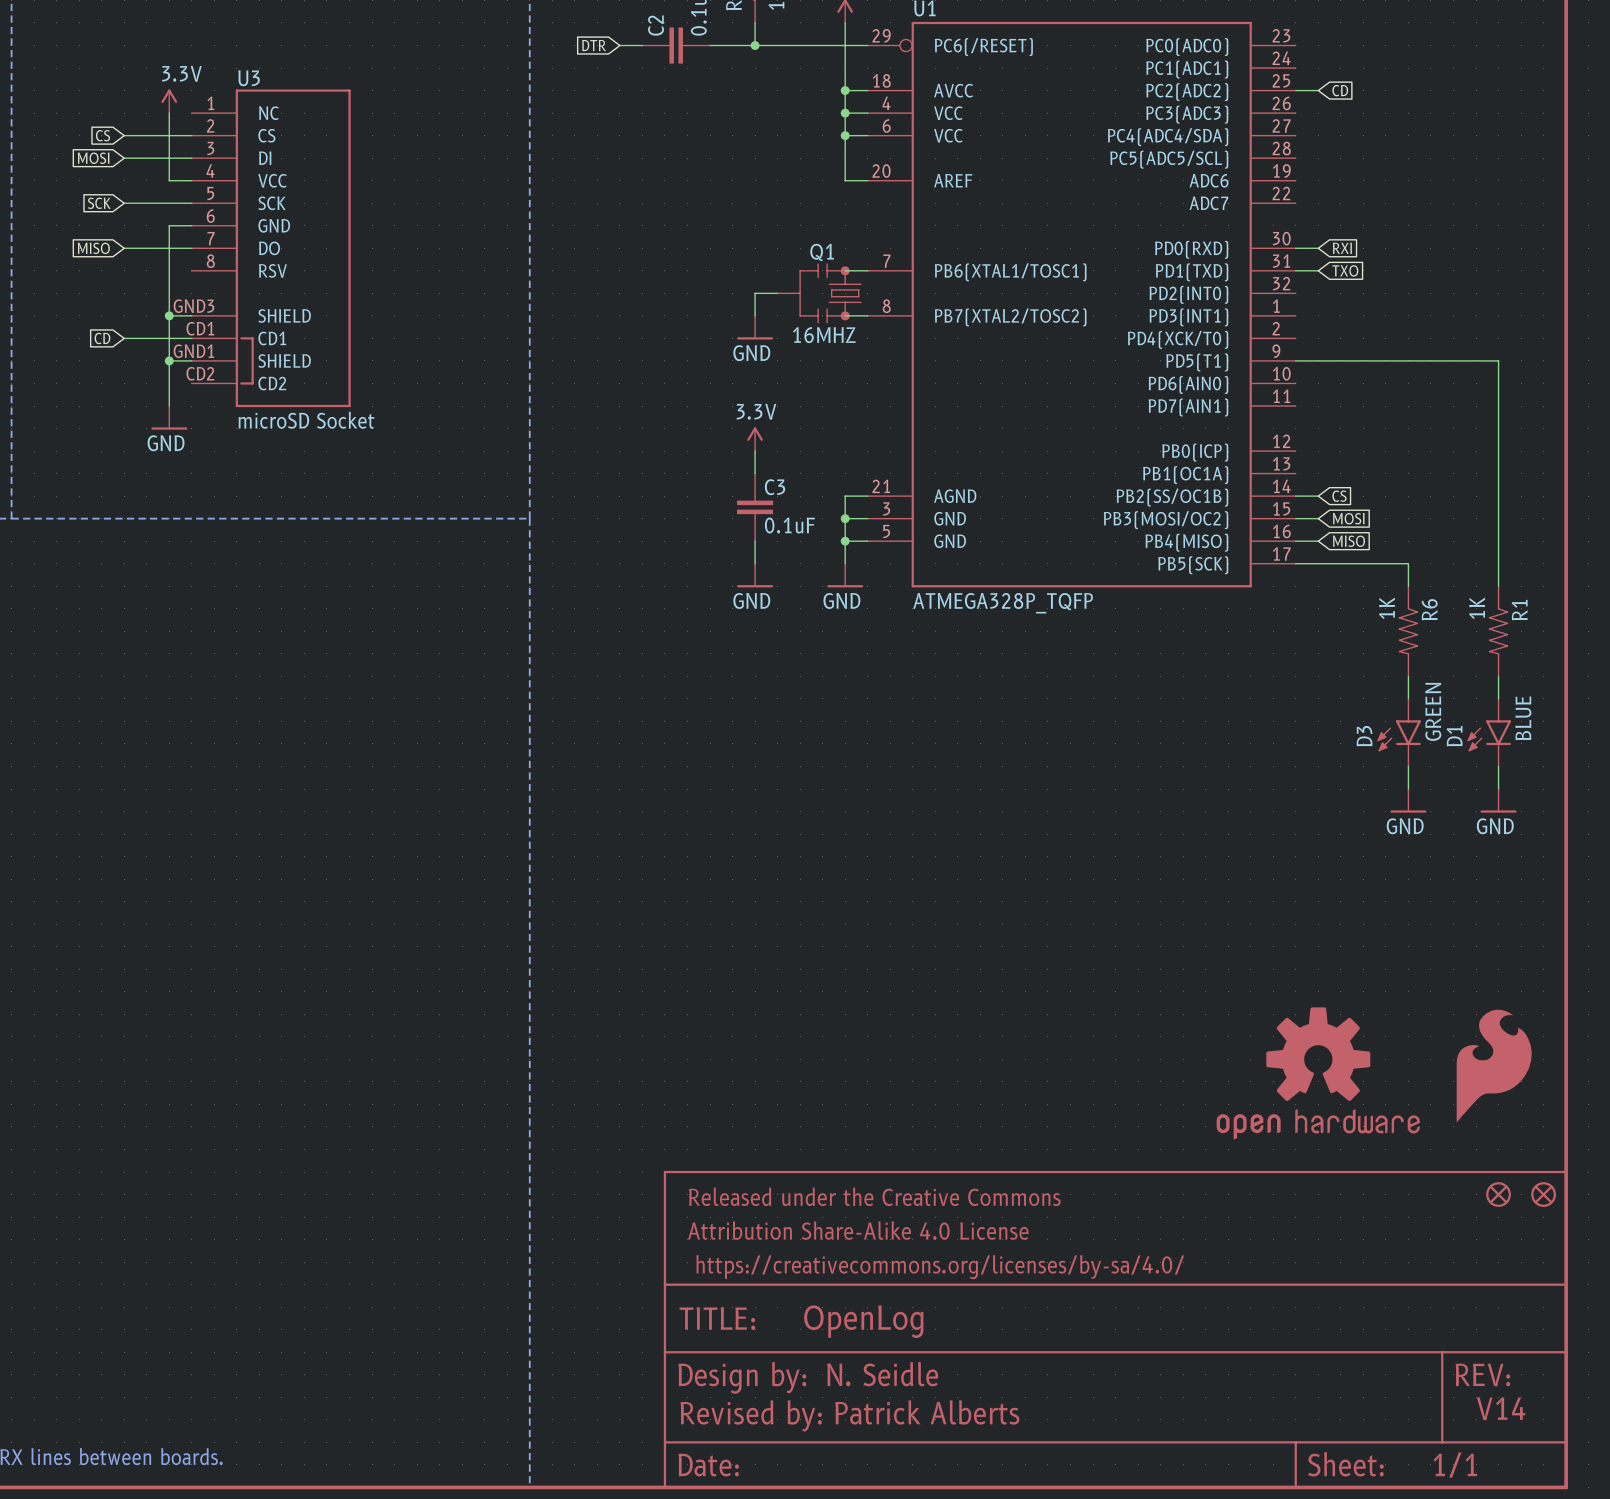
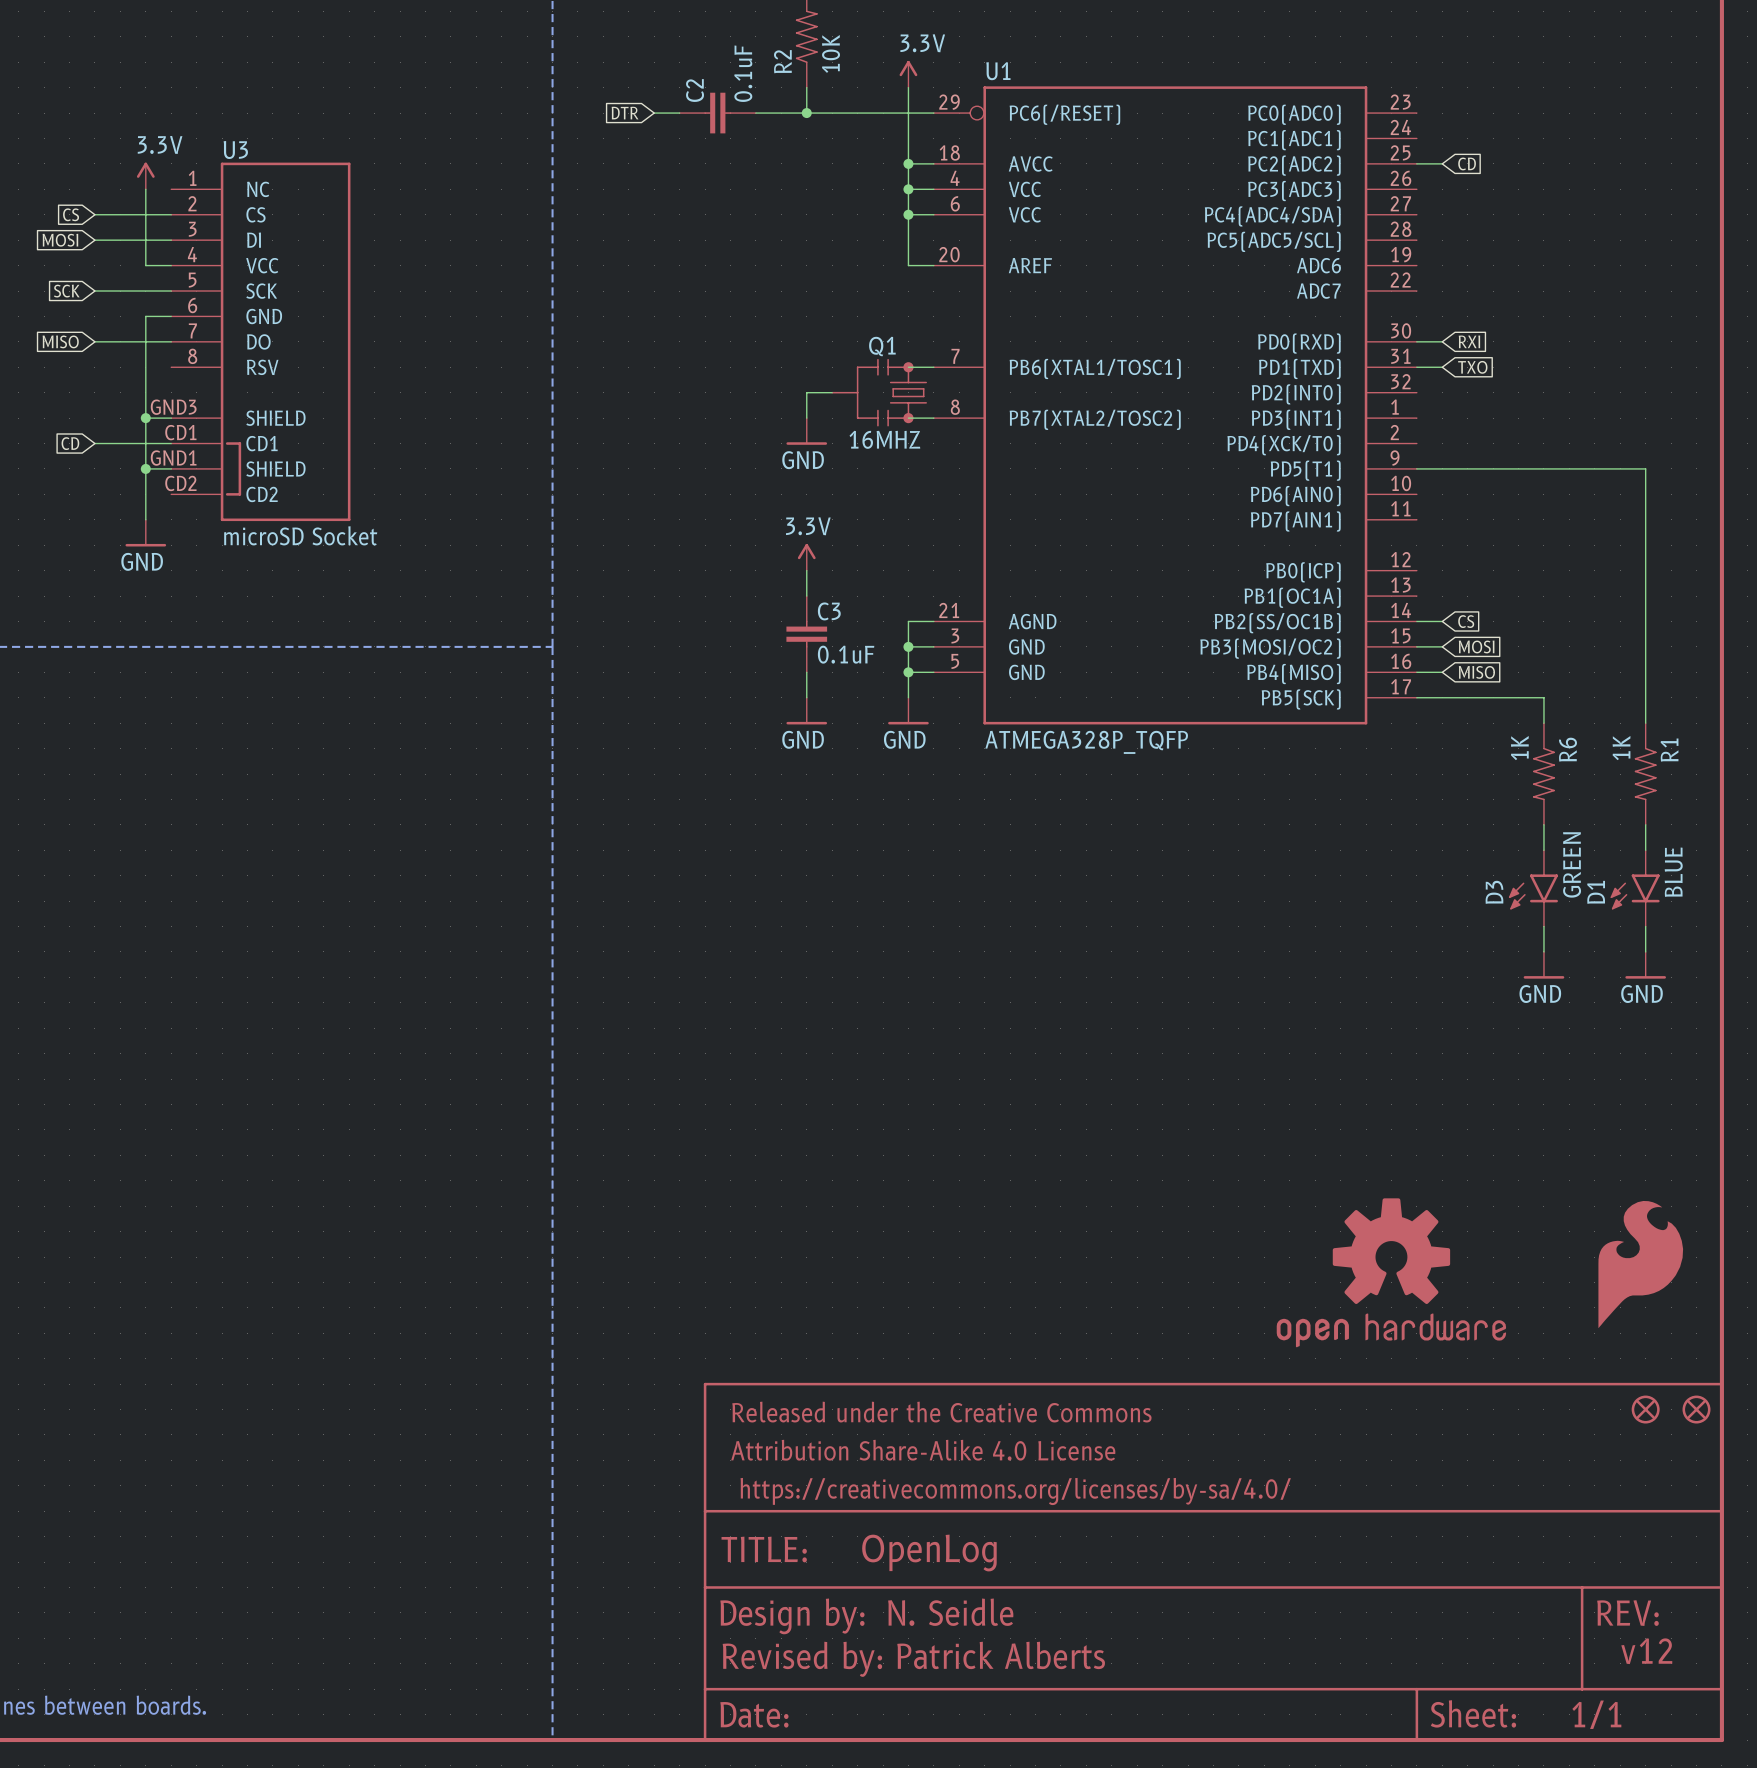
part position: (1318, 1073) -> (1391, 1272)
text: V14 (1501, 1408) -> v12 (1646, 1651)

